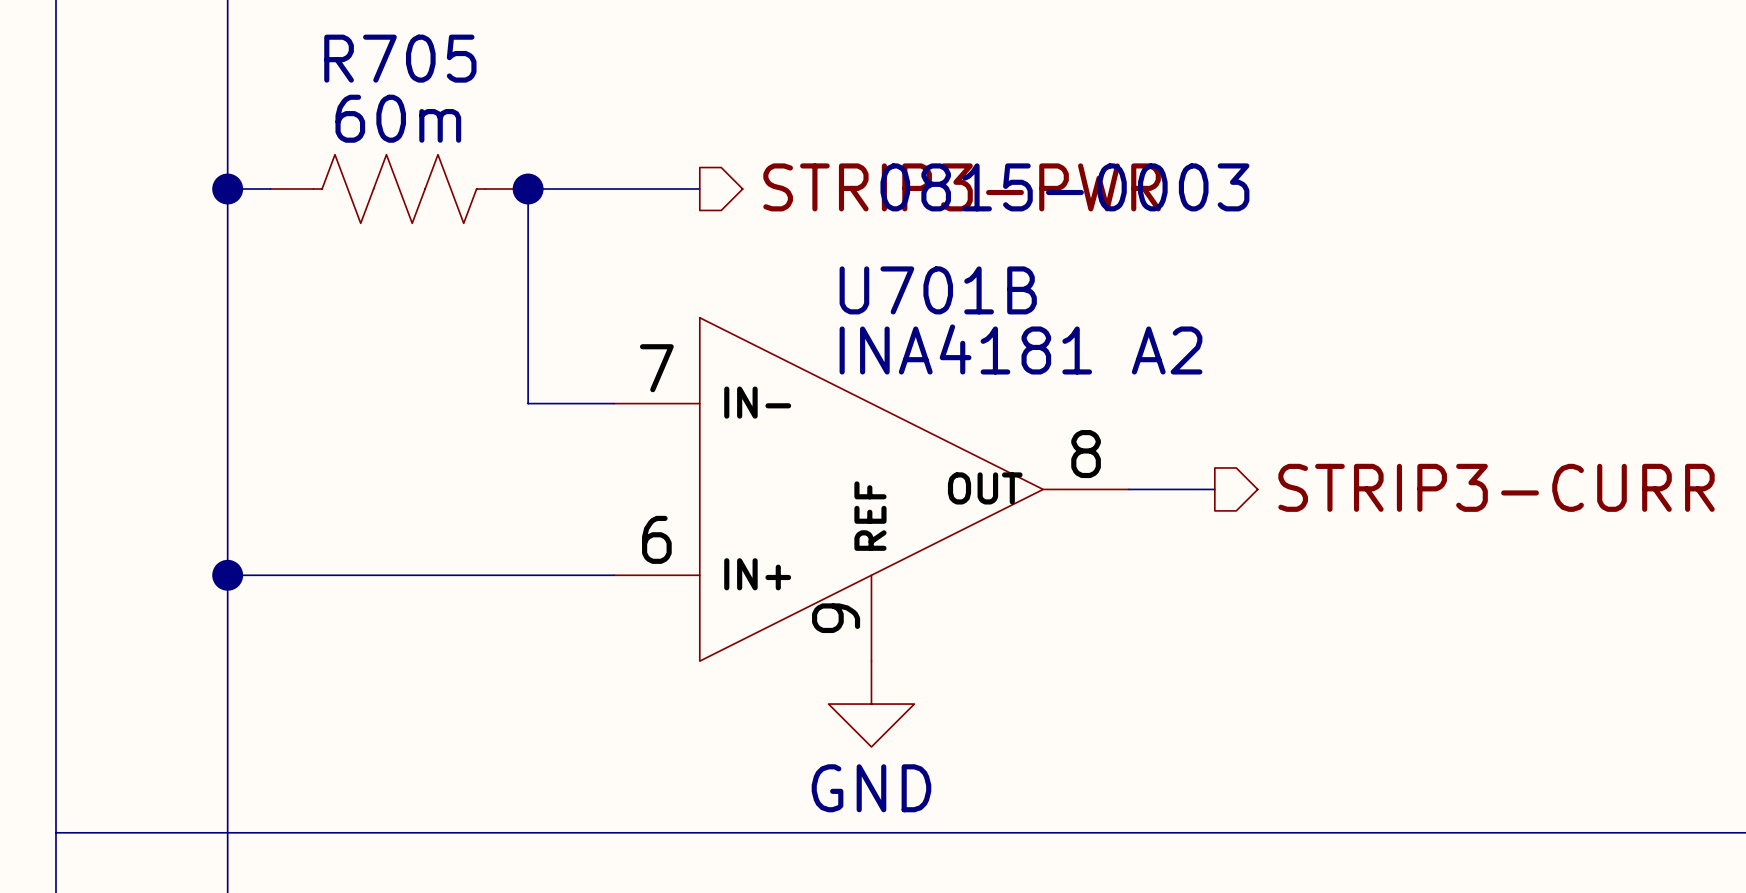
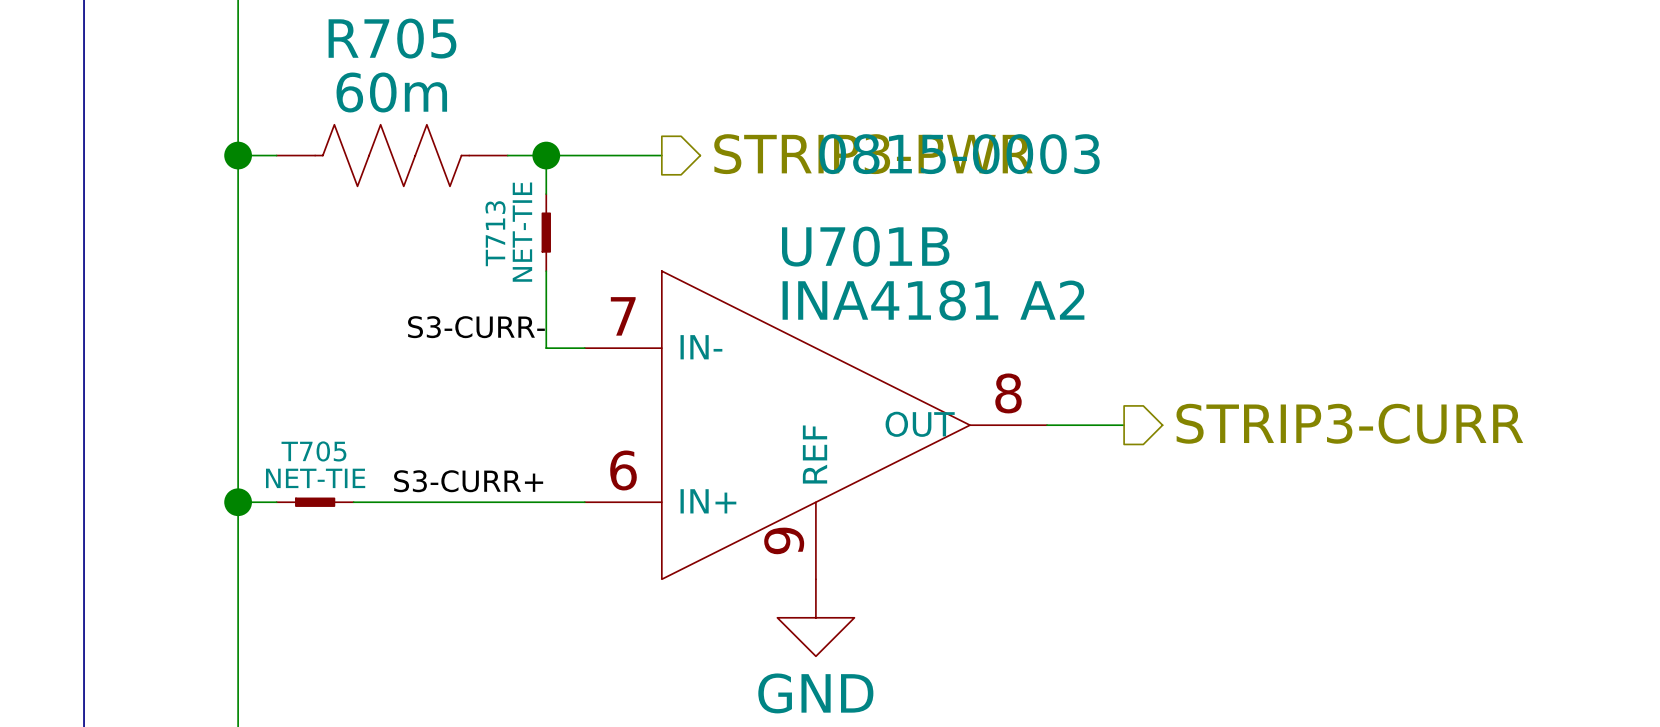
wire: (528, 189) (528, 403) (571, 403) -> (546, 271) (546, 348)
junction position: (528, 189) -> (546, 155)
wire: none -> (546, 155) (546, 194)
T713: none -> NET-TIE (546, 232)
label: none -> S3-CURR- (476, 327)
label: none -> S3-CURR+ (468, 481)
T705: none -> NET-TIE (315, 502)

